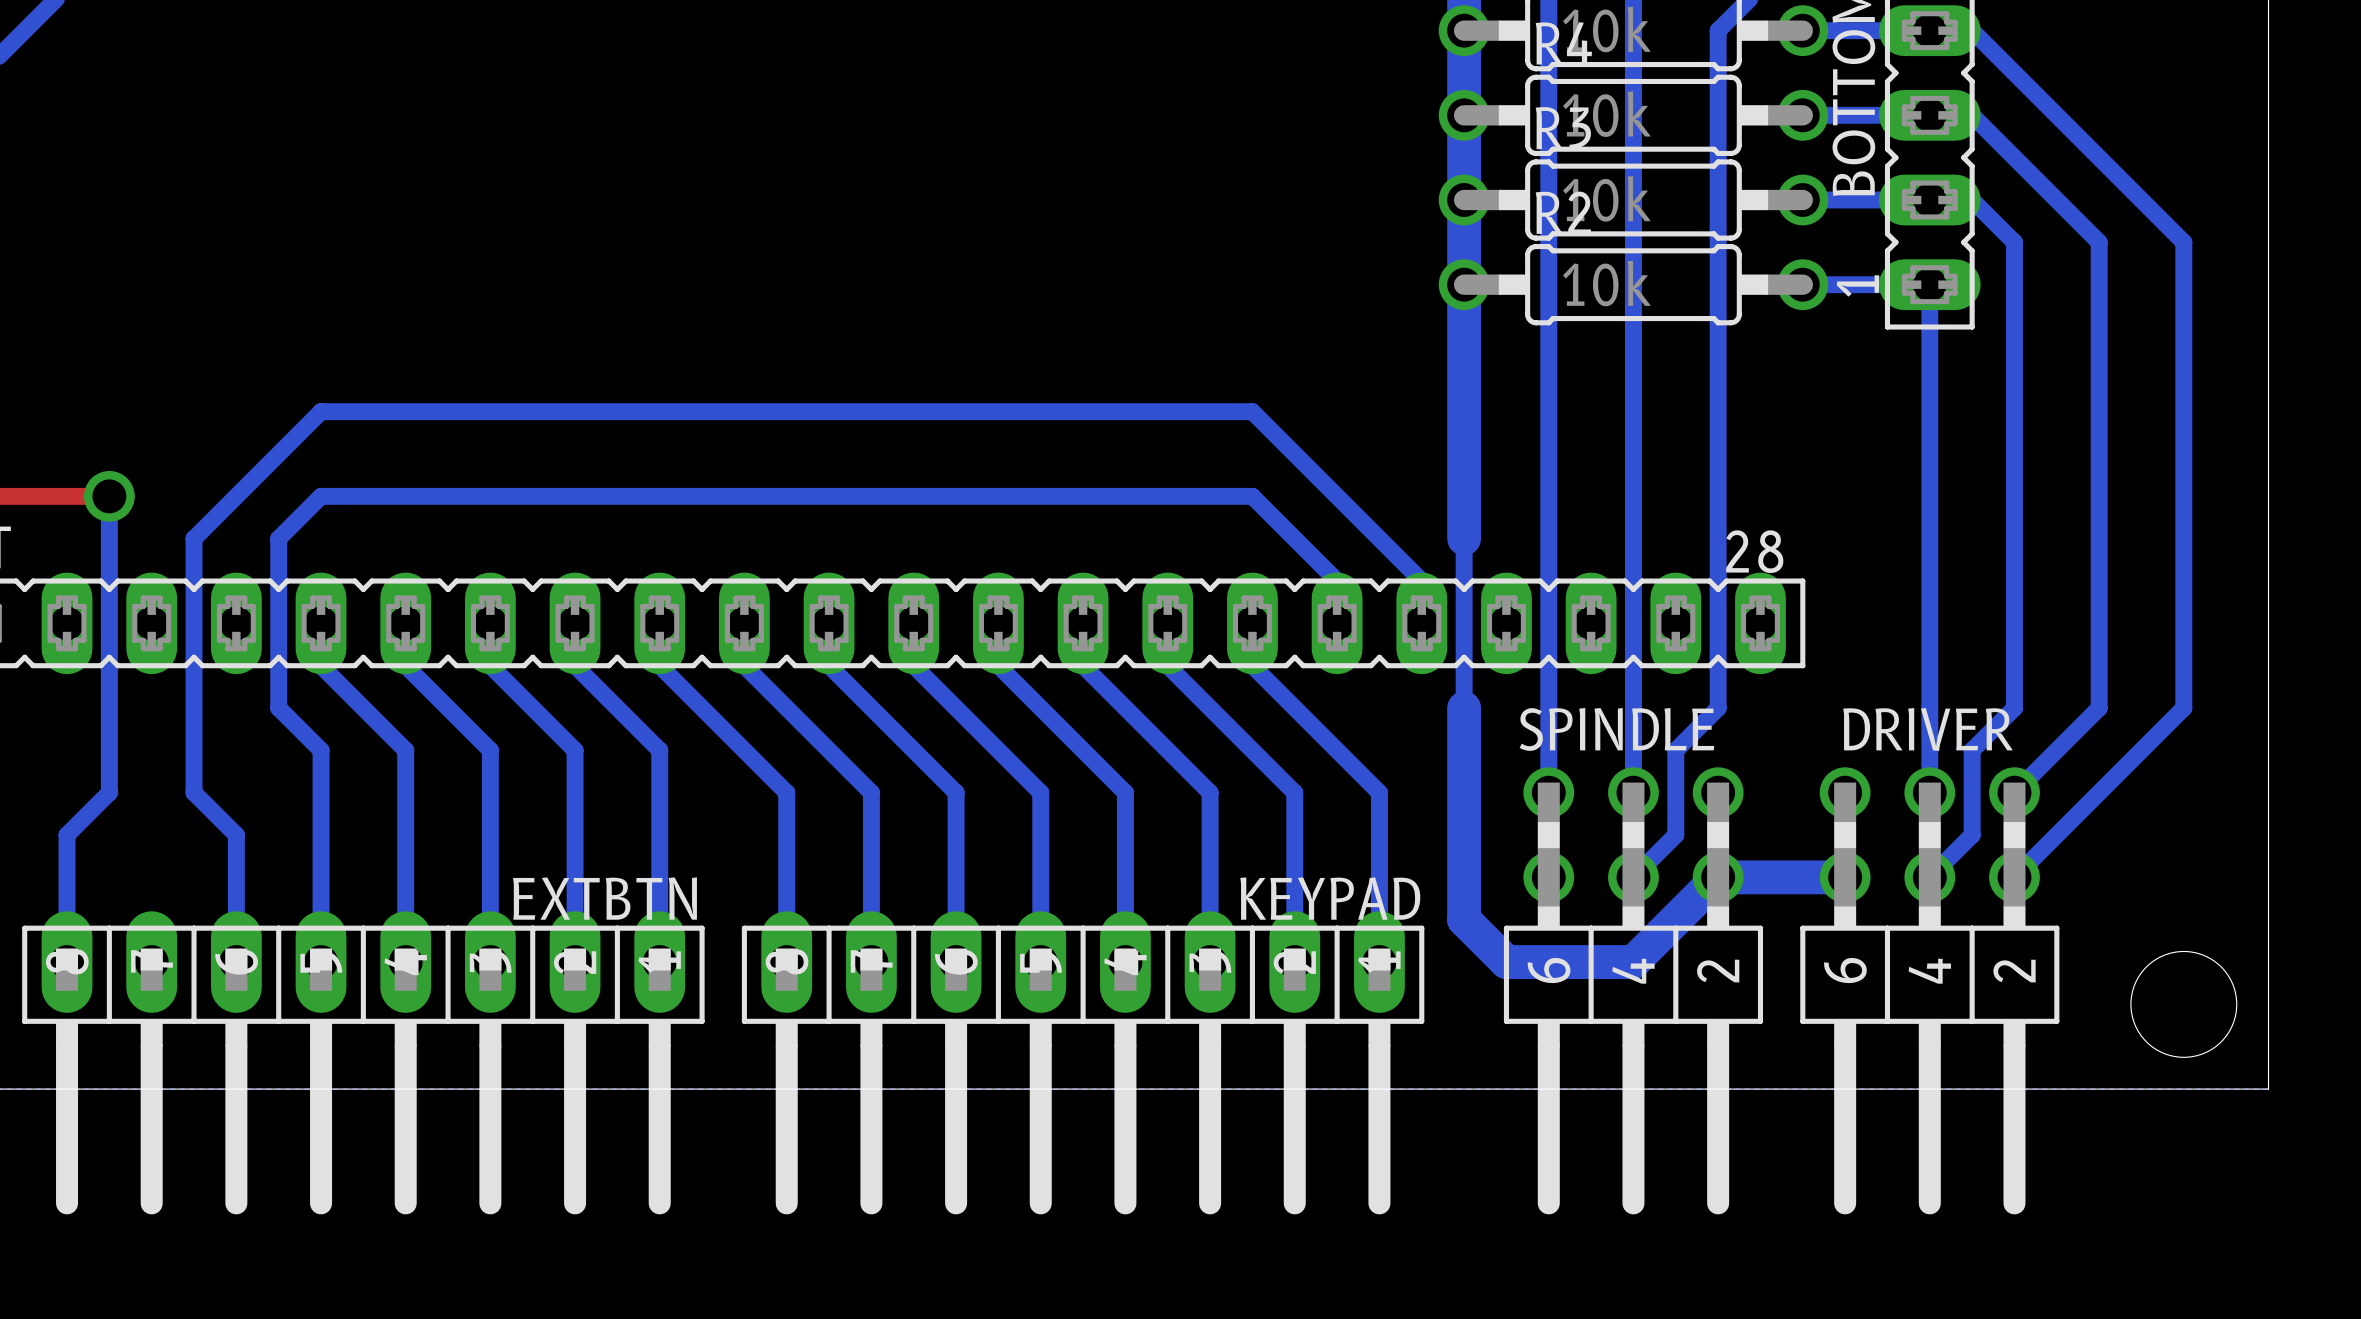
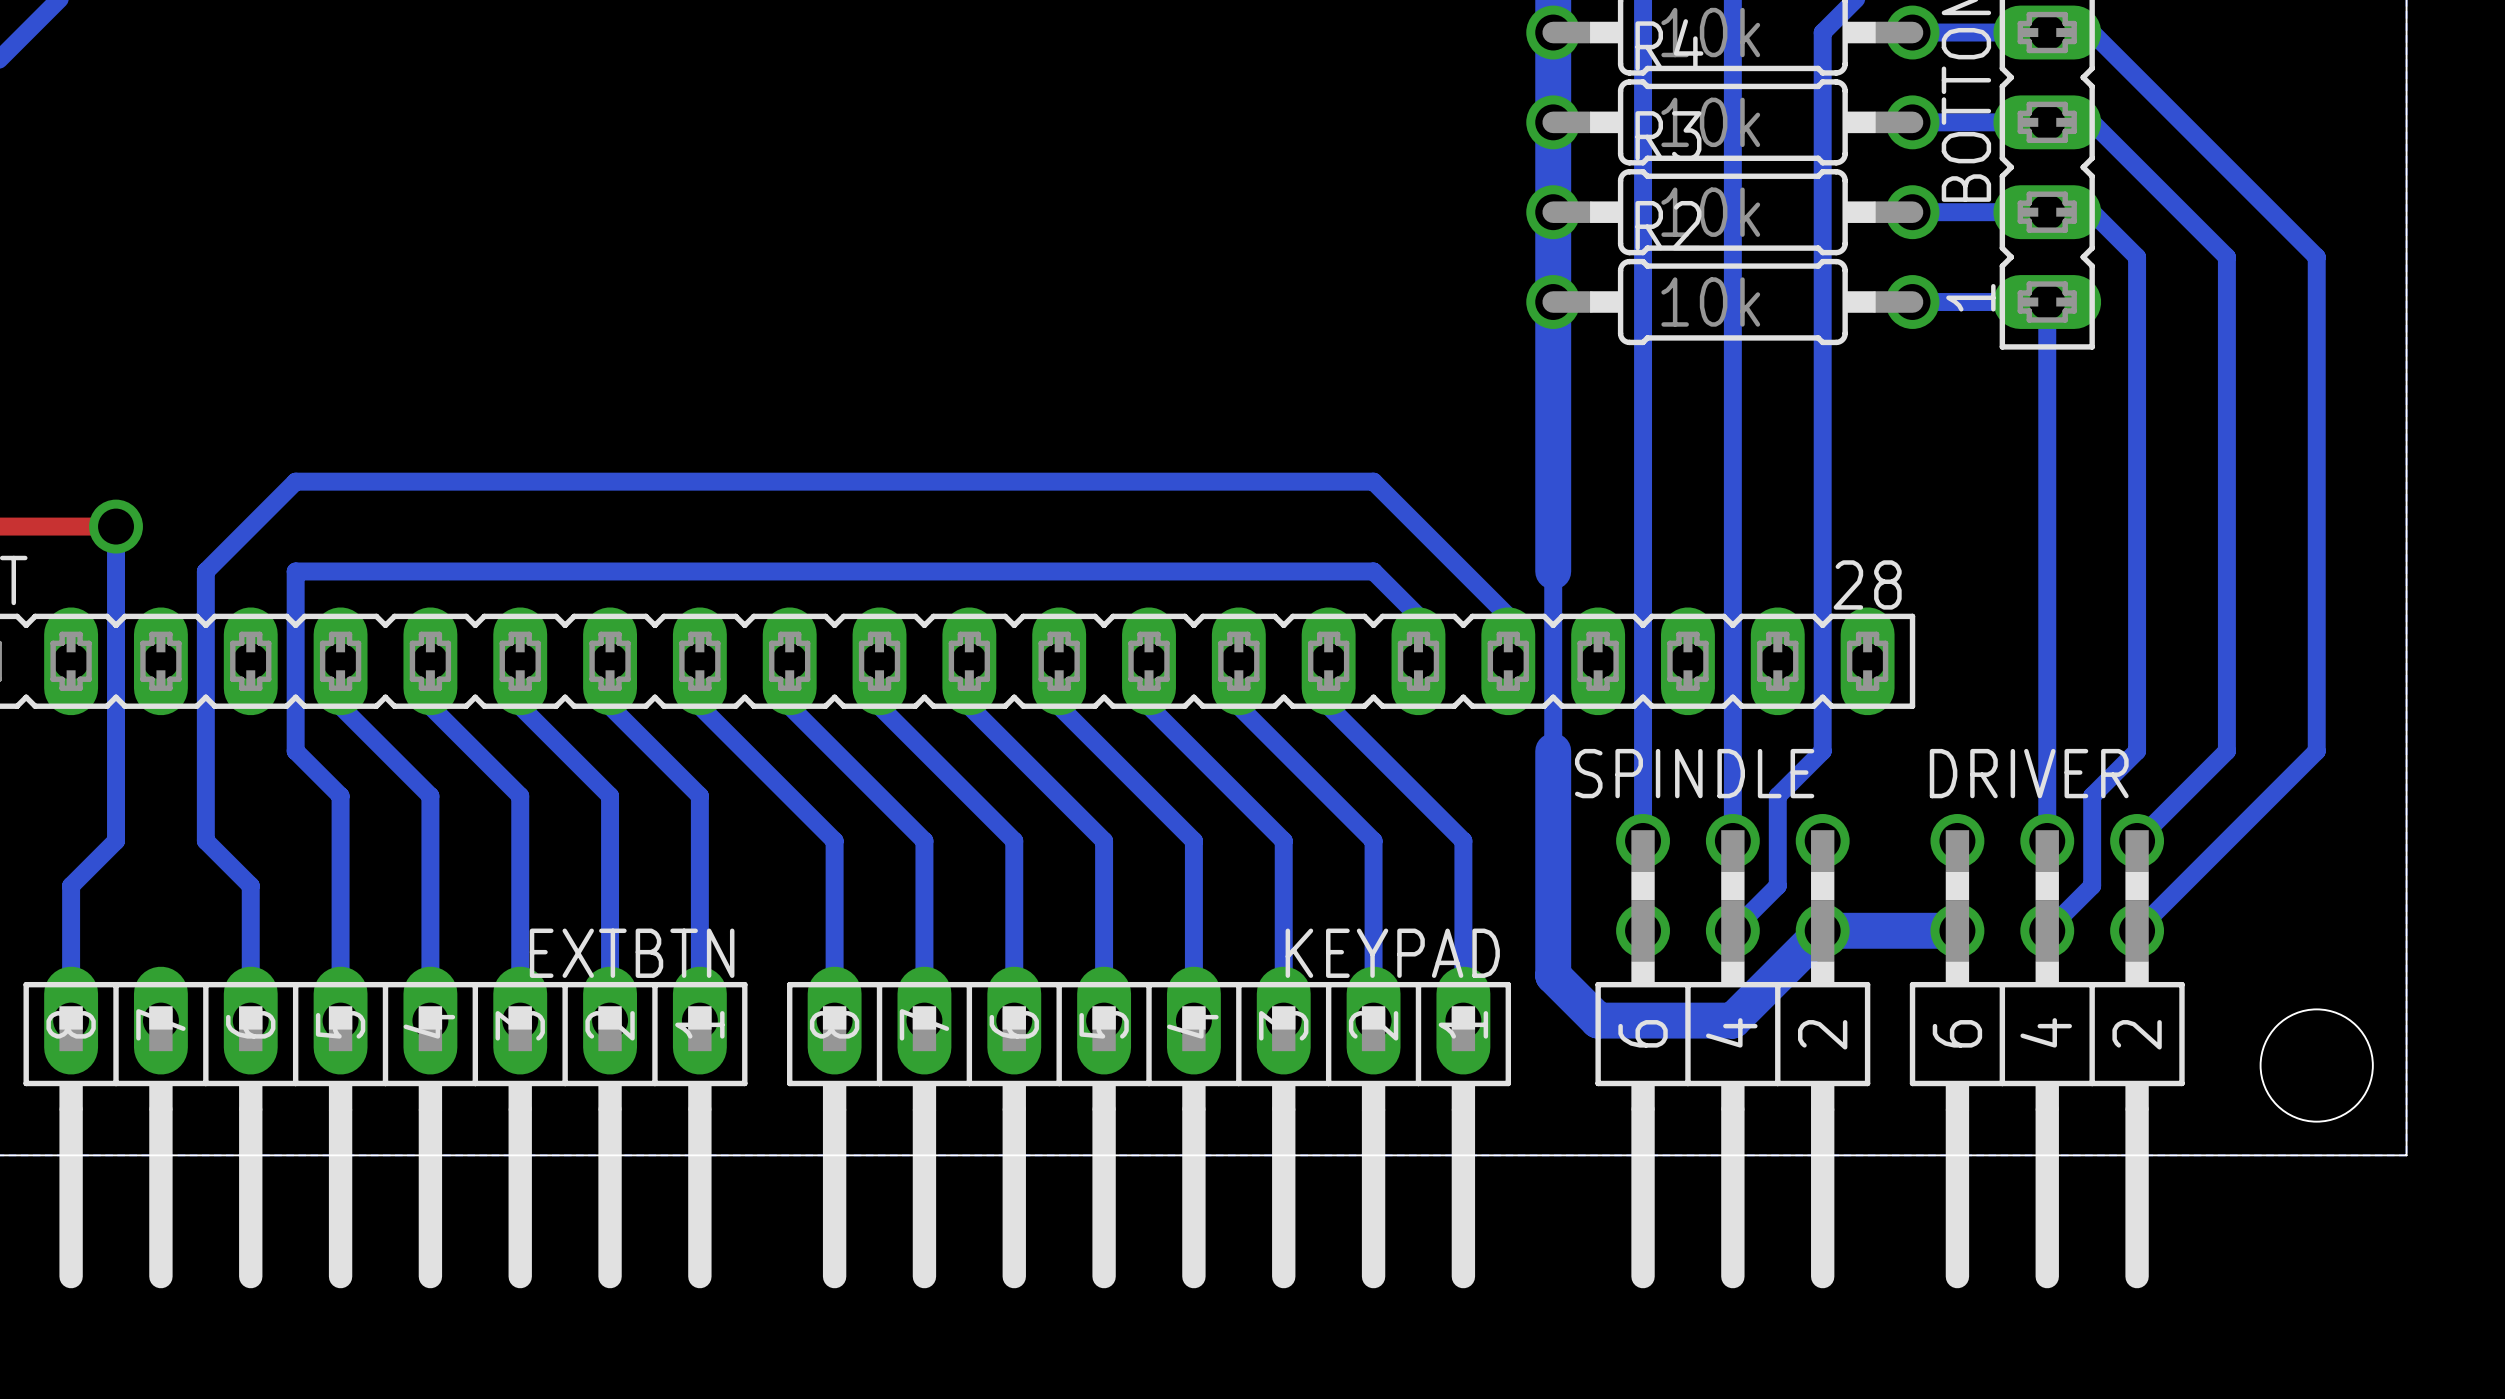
bottom track: (278, 454) (321, 411) (1252, 411) (1294, 454) -> (295, 481) (1373, 481)
bottom track: (278, 538) (321, 496) (1252, 496) (1294, 538) -> (295, 571) (1373, 571)

